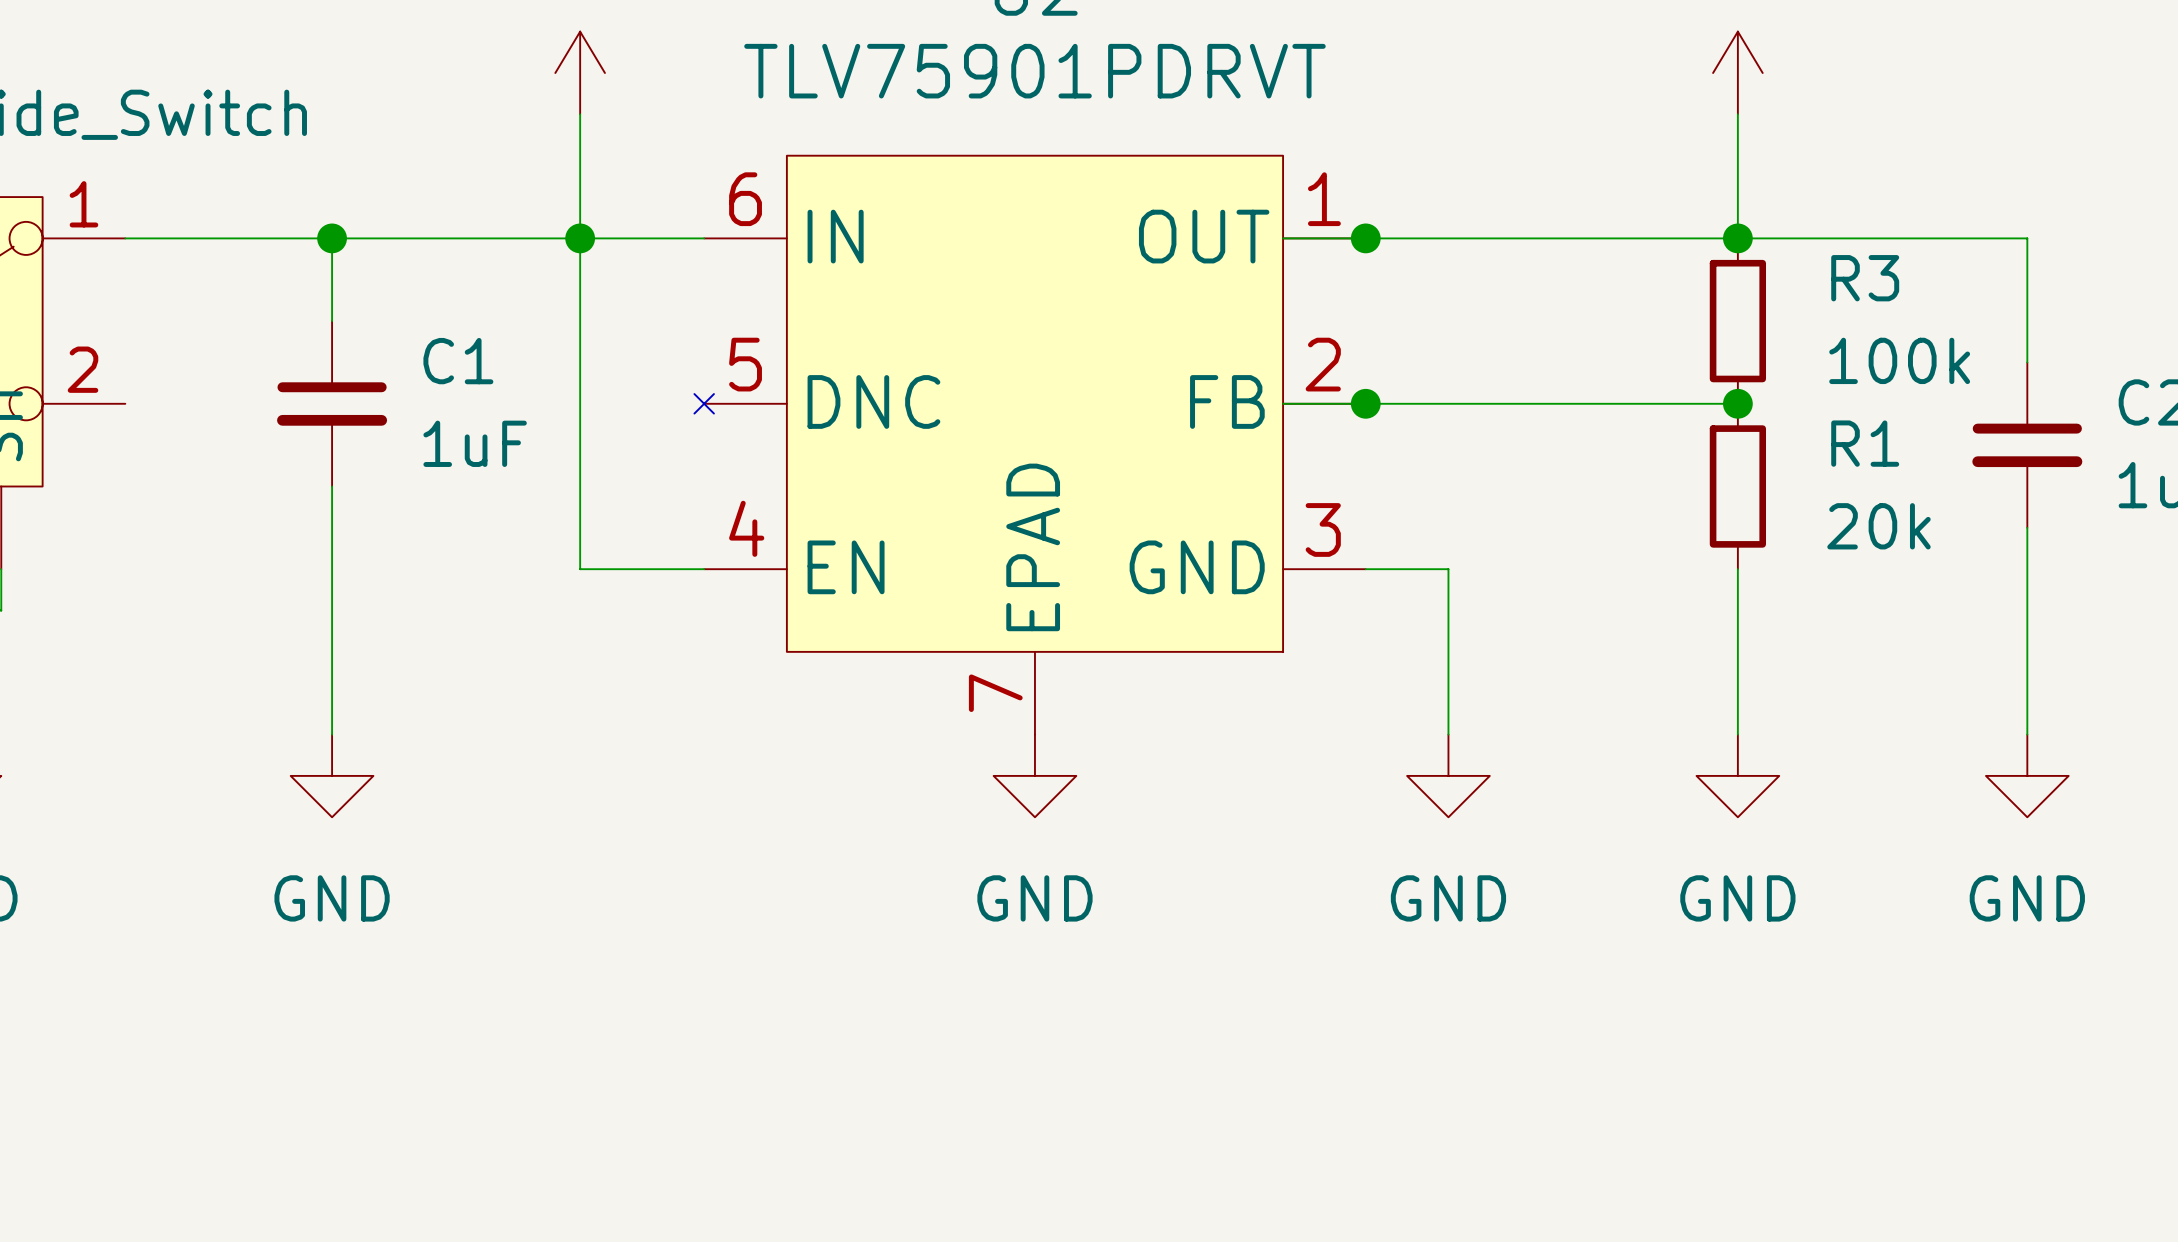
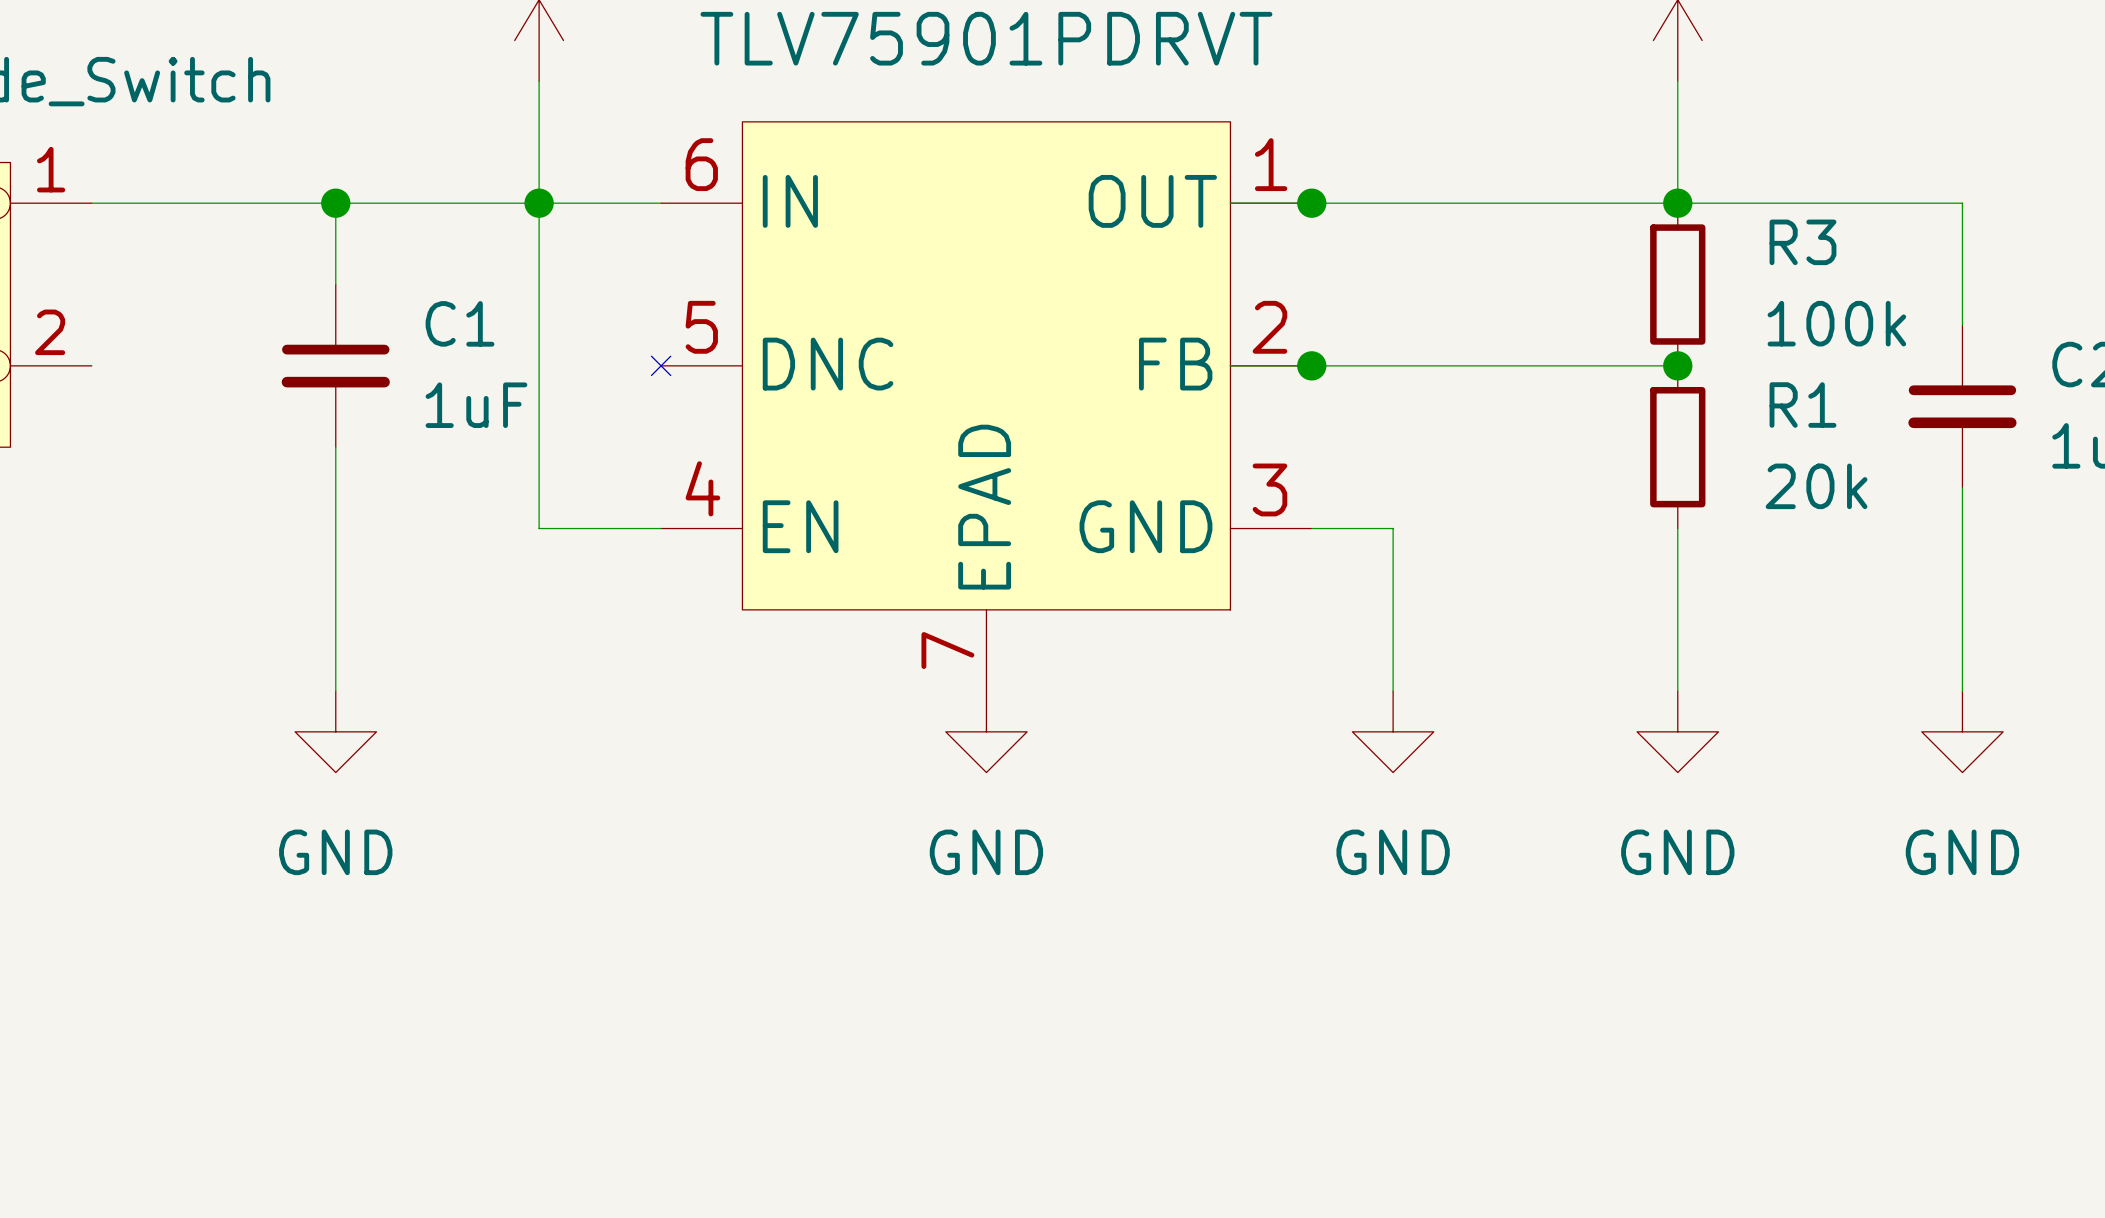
wire: (332, 238) (332, 321) -> (335, 203) (335, 284)
junction position: (332, 238) -> (335, 203)
C1 position: (332, 403) -> (335, 365)
wire: (332, 486) (332, 734) -> (335, 447) (335, 691)
power symbol position: GND (332, 775) -> GND (335, 731)

